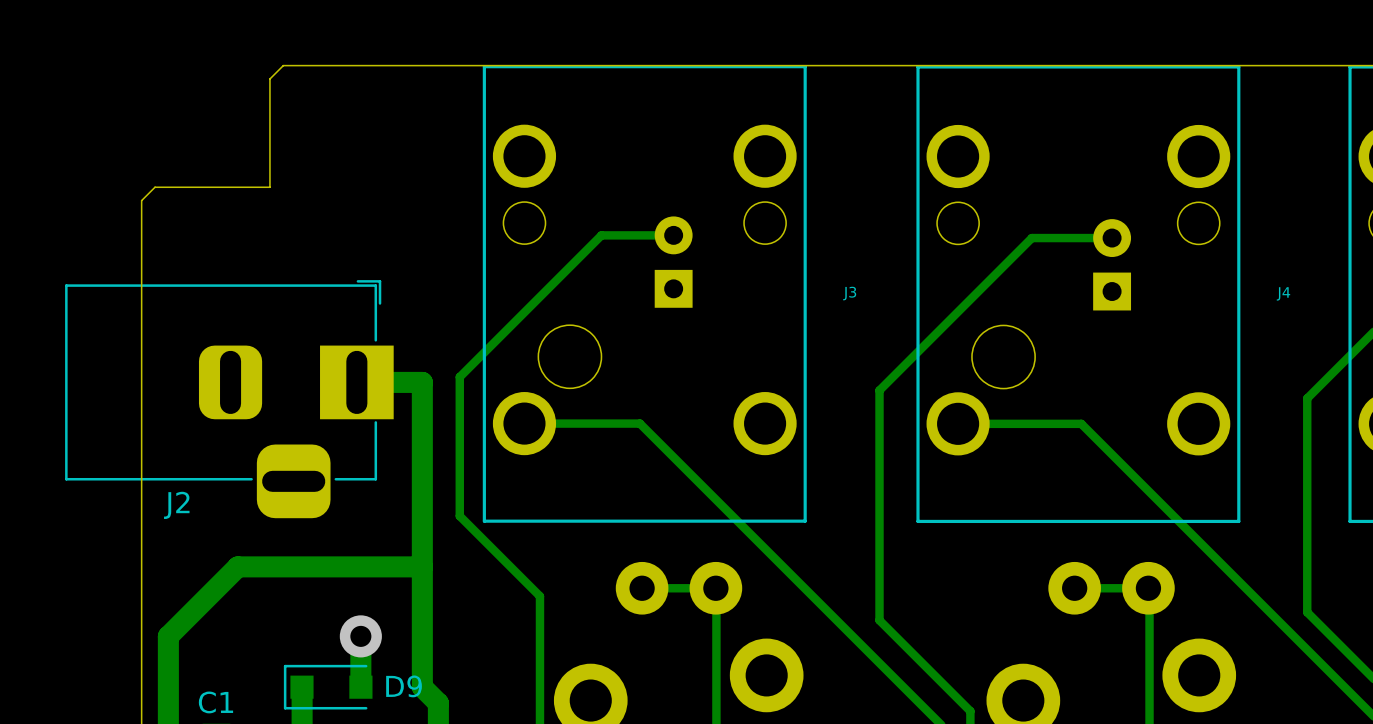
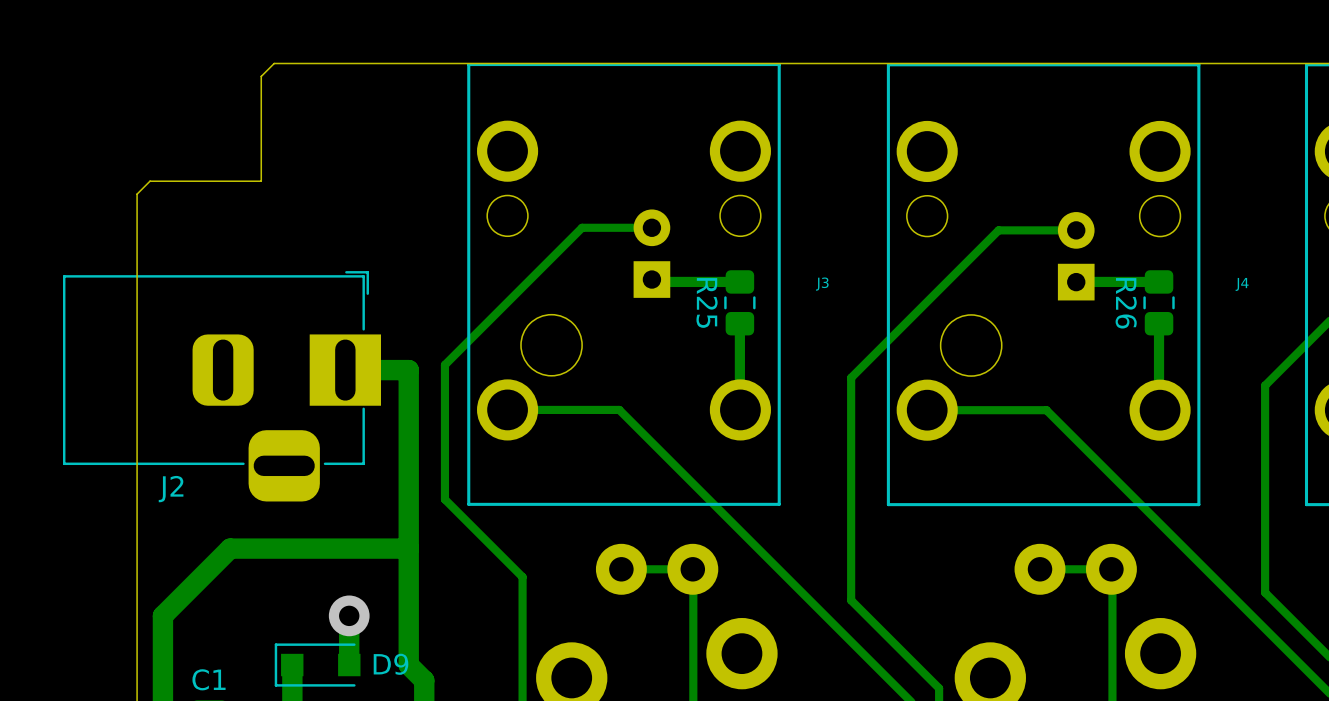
track: none -> (651, 279) (654, 281) (739, 281)
track: none -> (1159, 281) (1076, 281)
R25: none -> (739, 302)
R26: none -> (1159, 302)
track: none -> (739, 323) (740, 409)
track: none -> (1159, 323) (1160, 410)

